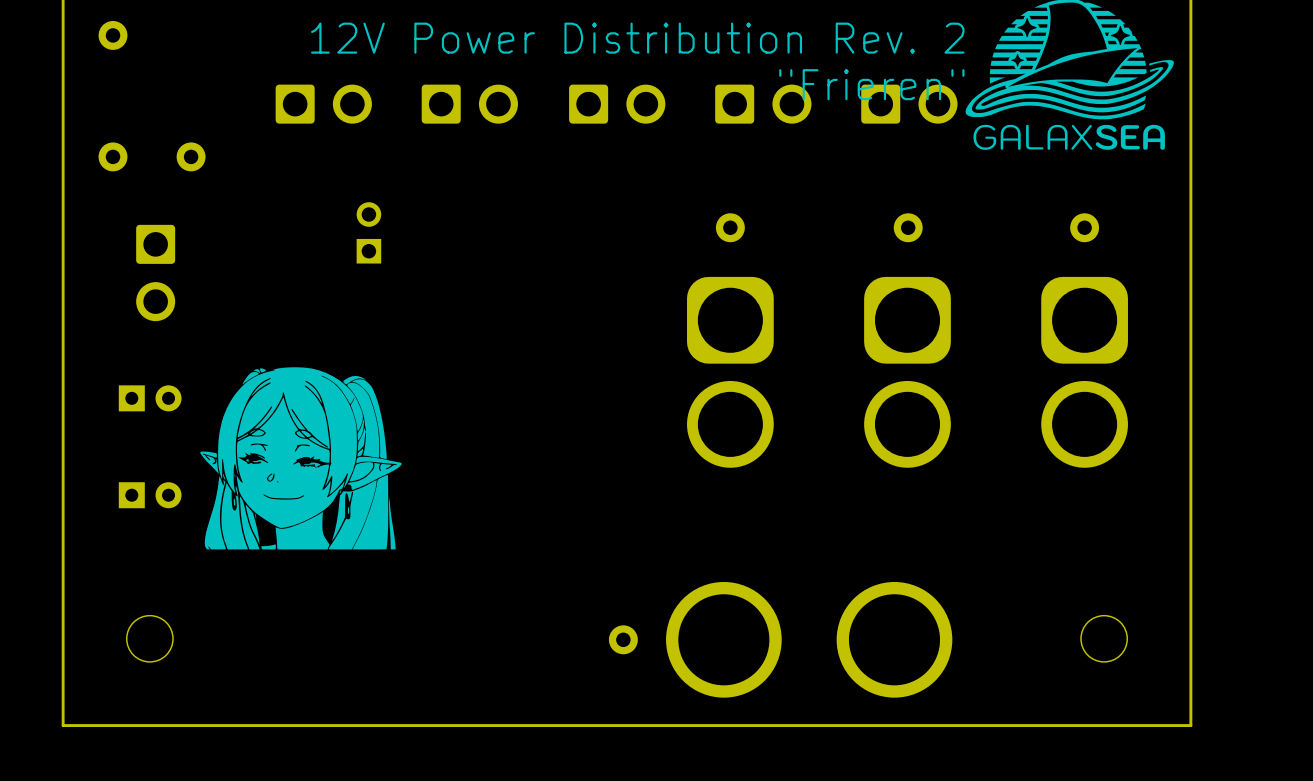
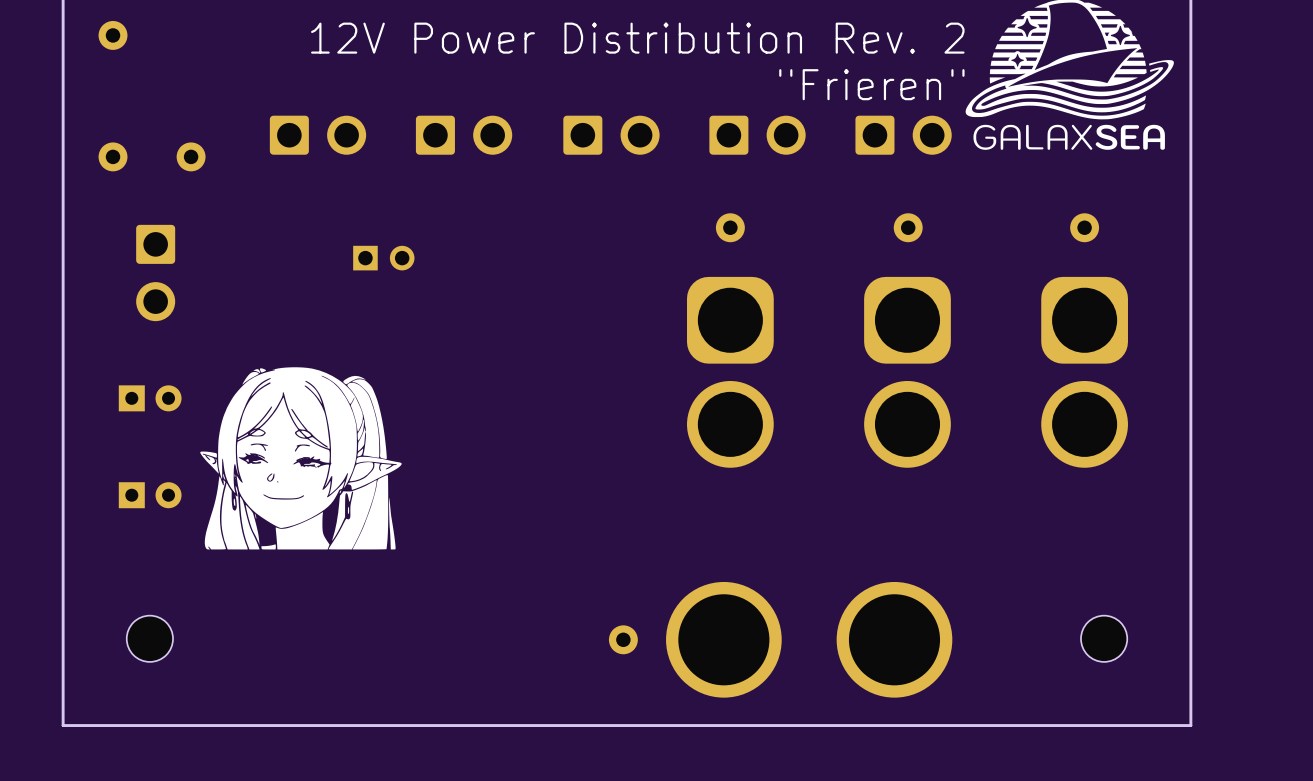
part position: (323, 104) -> (317, 135)
part position: (469, 104) -> (464, 135)
part position: (617, 104) -> (611, 135)
part position: (763, 104) -> (757, 135)
part position: (909, 104) -> (903, 135)
part rotation: 0° (368, 232) -> 90° clockwise (383, 258)

